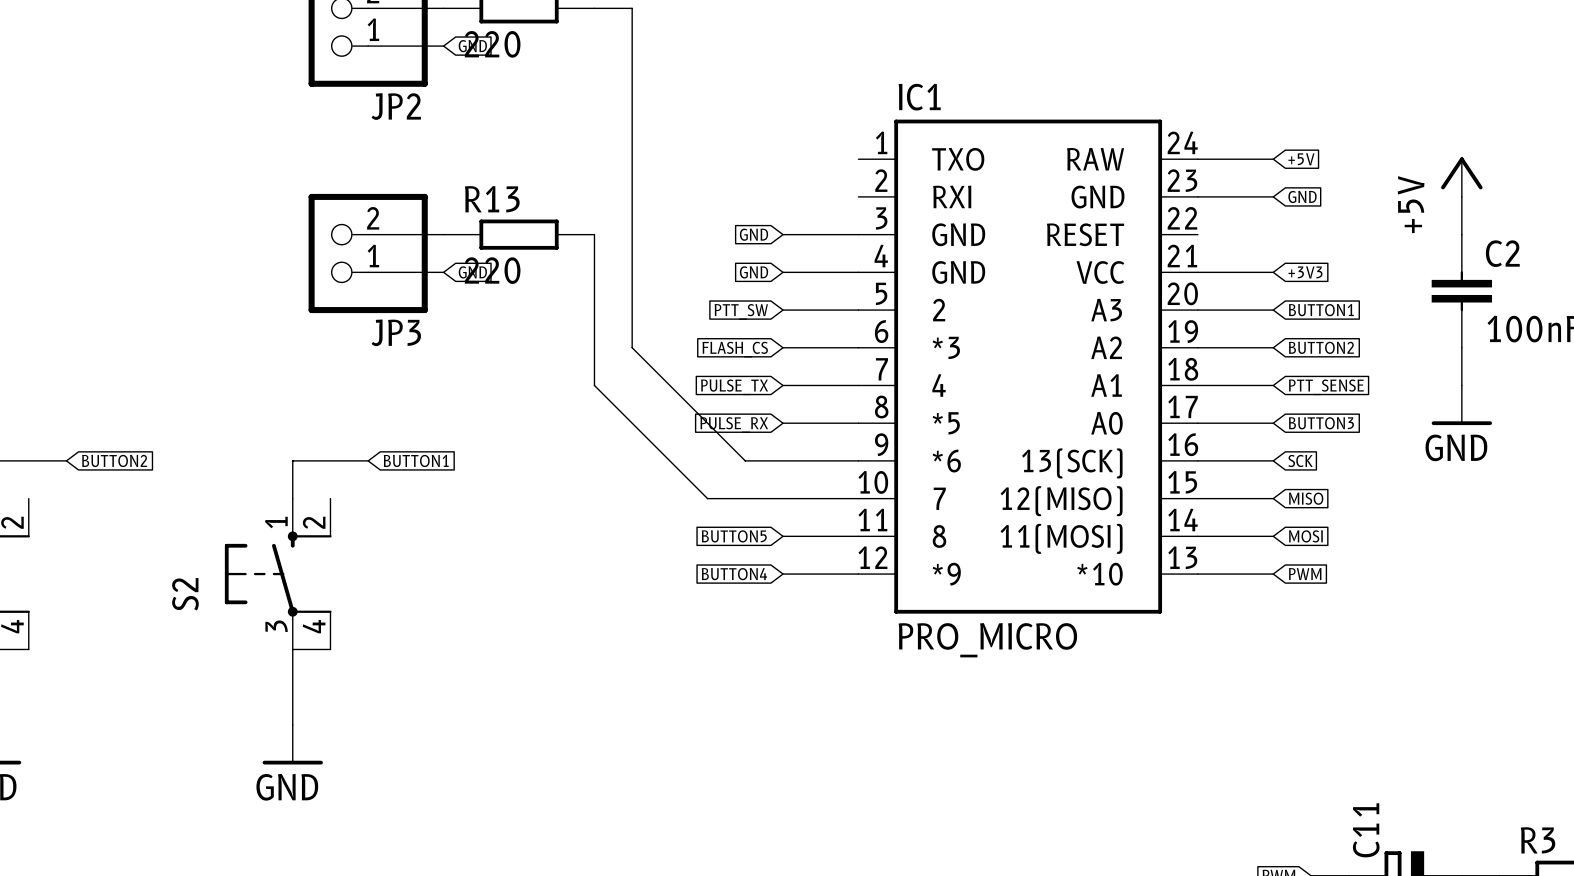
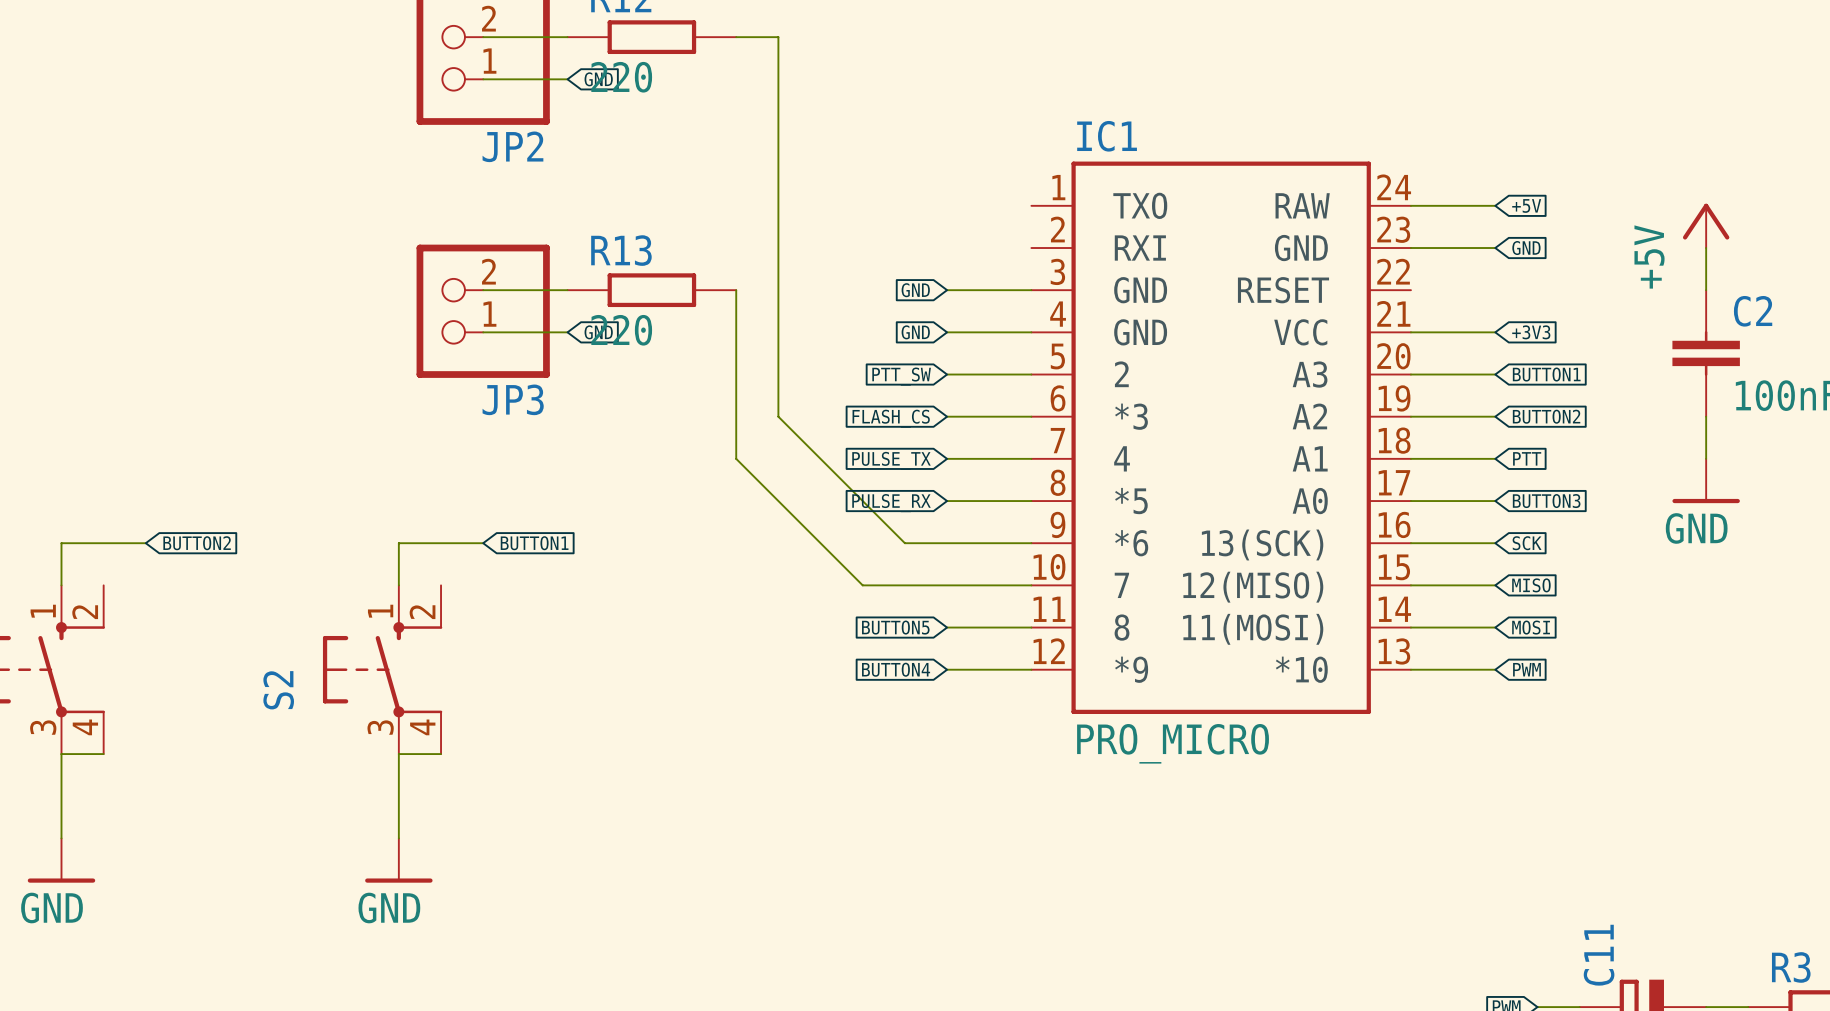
global label: PTT_SENSE (1326, 387) -> PTT (1527, 458)

